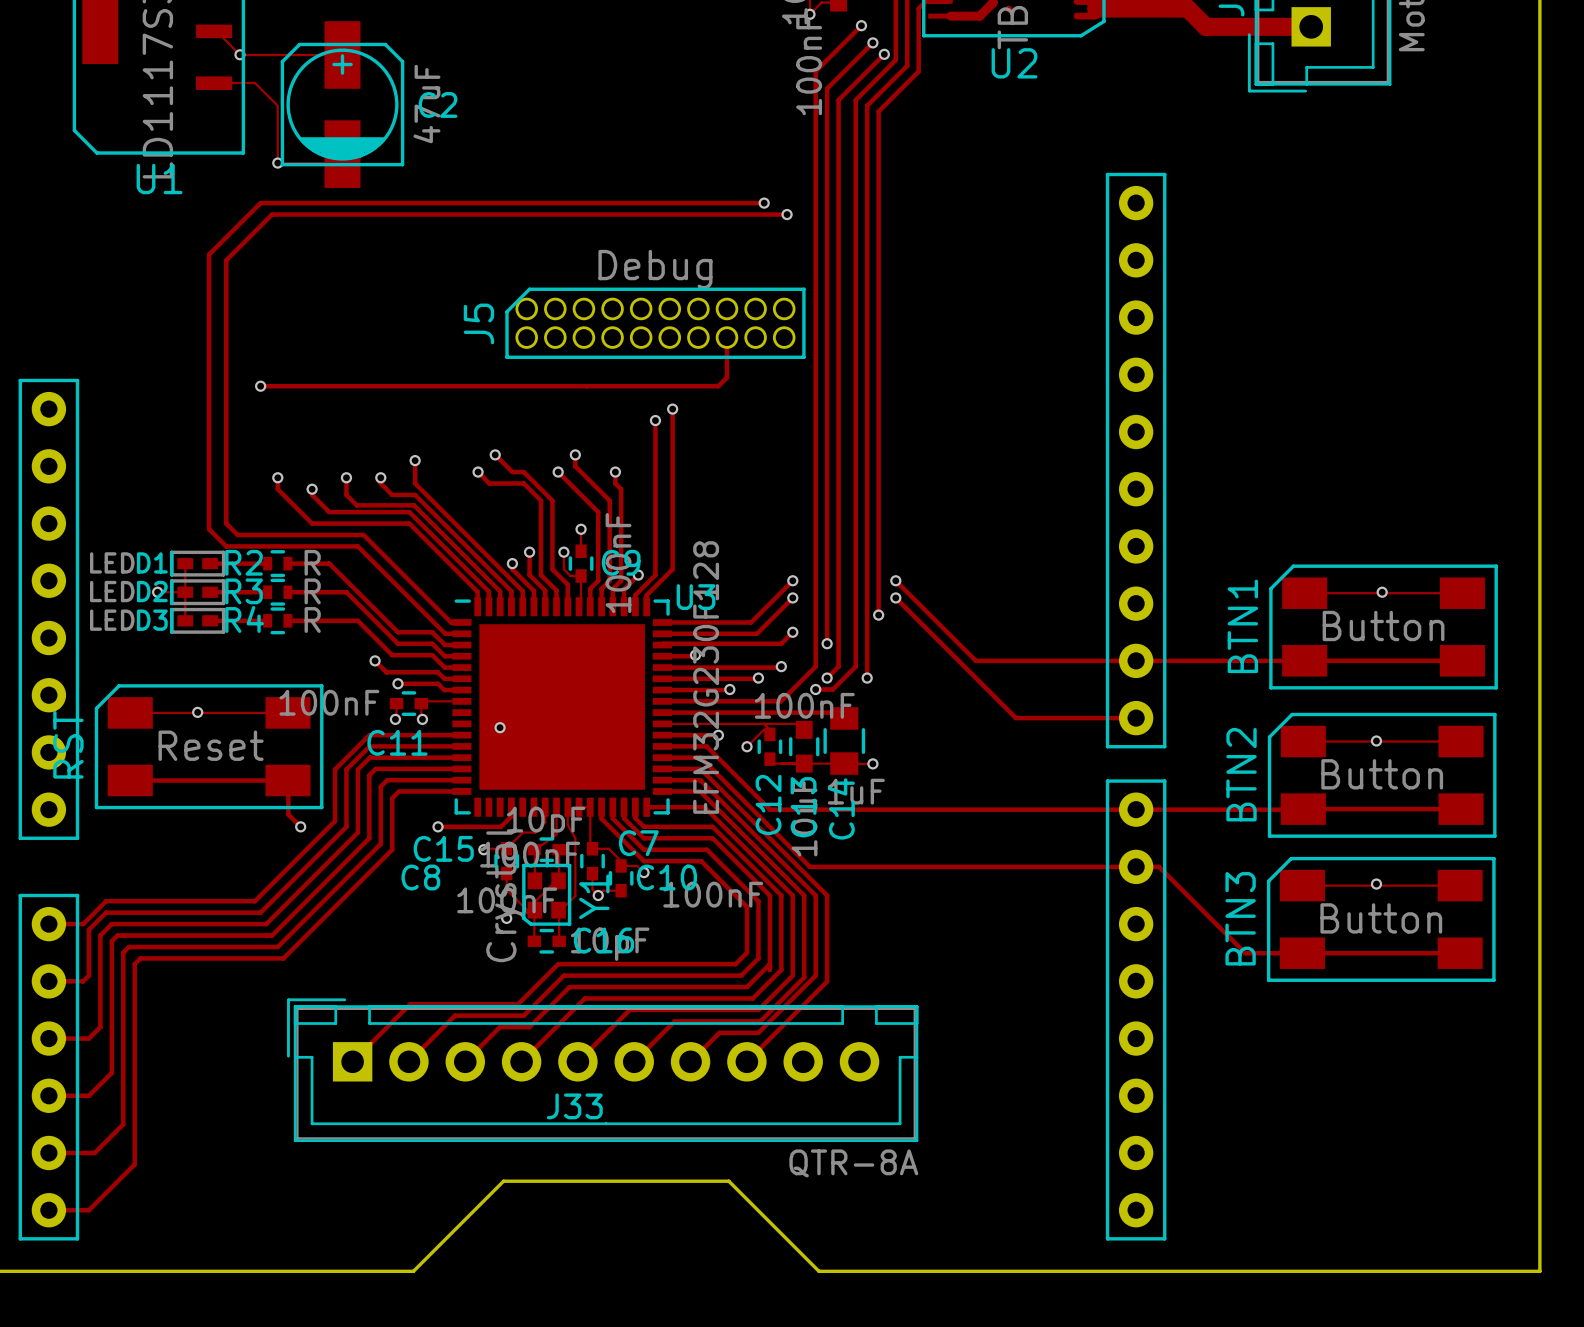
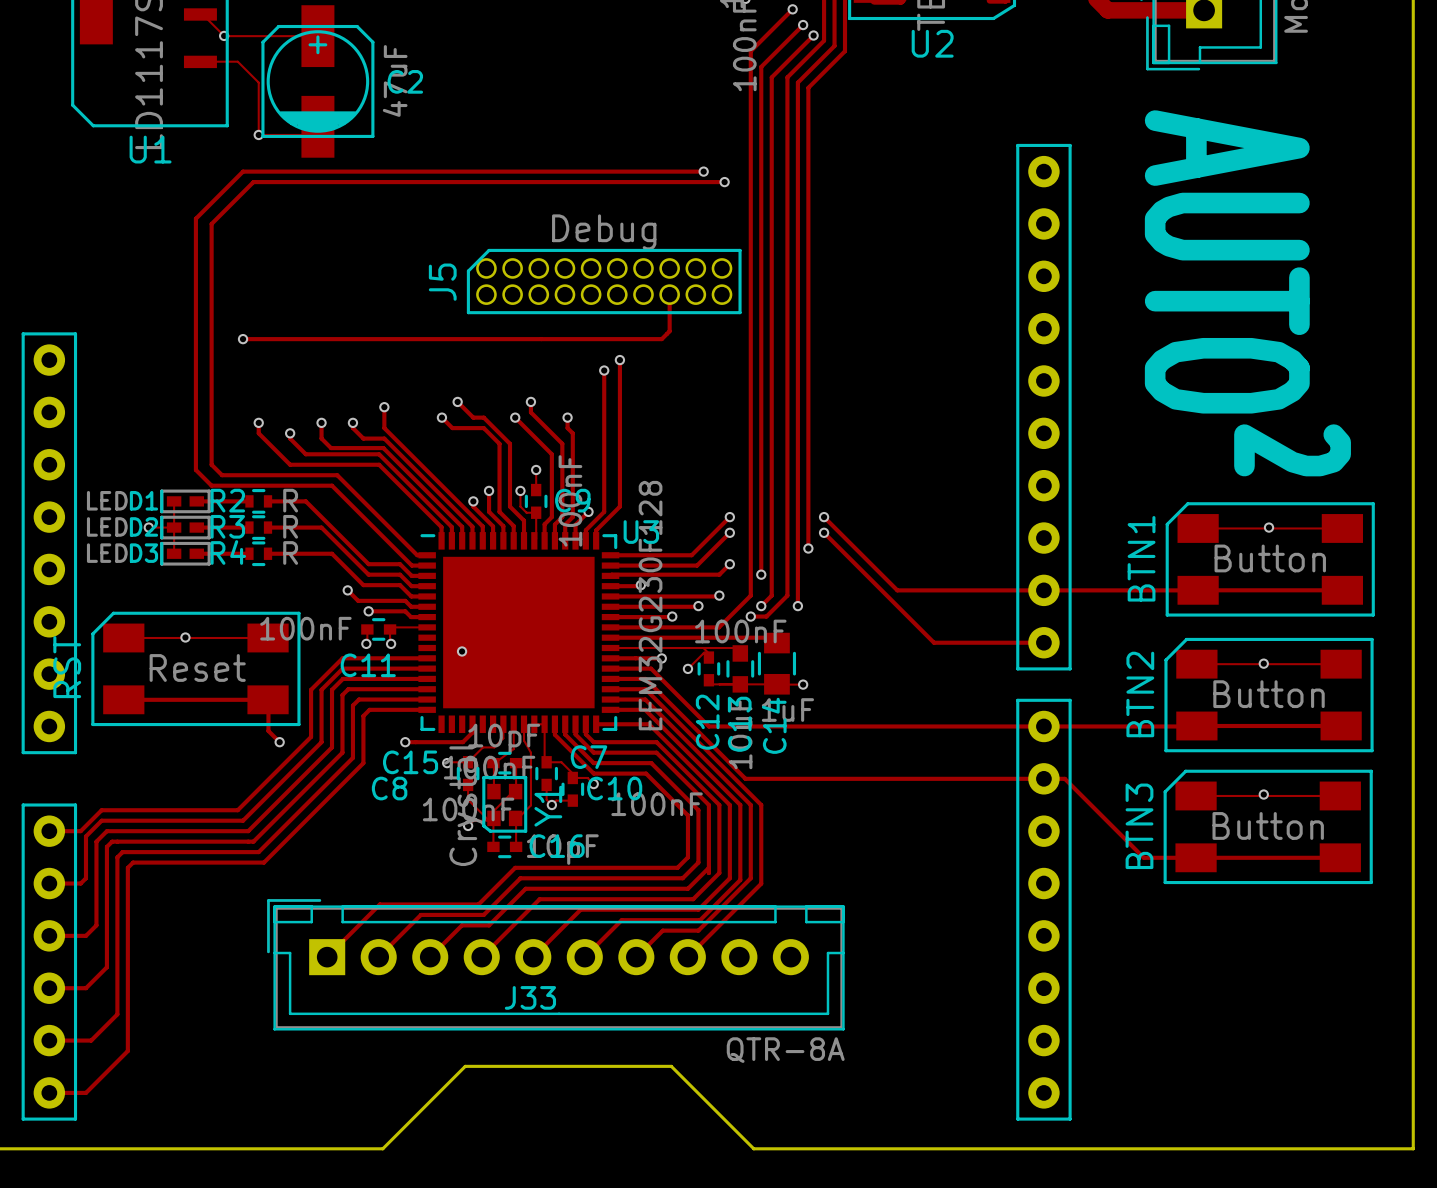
text: none -> AUTO² (1247, 293)

